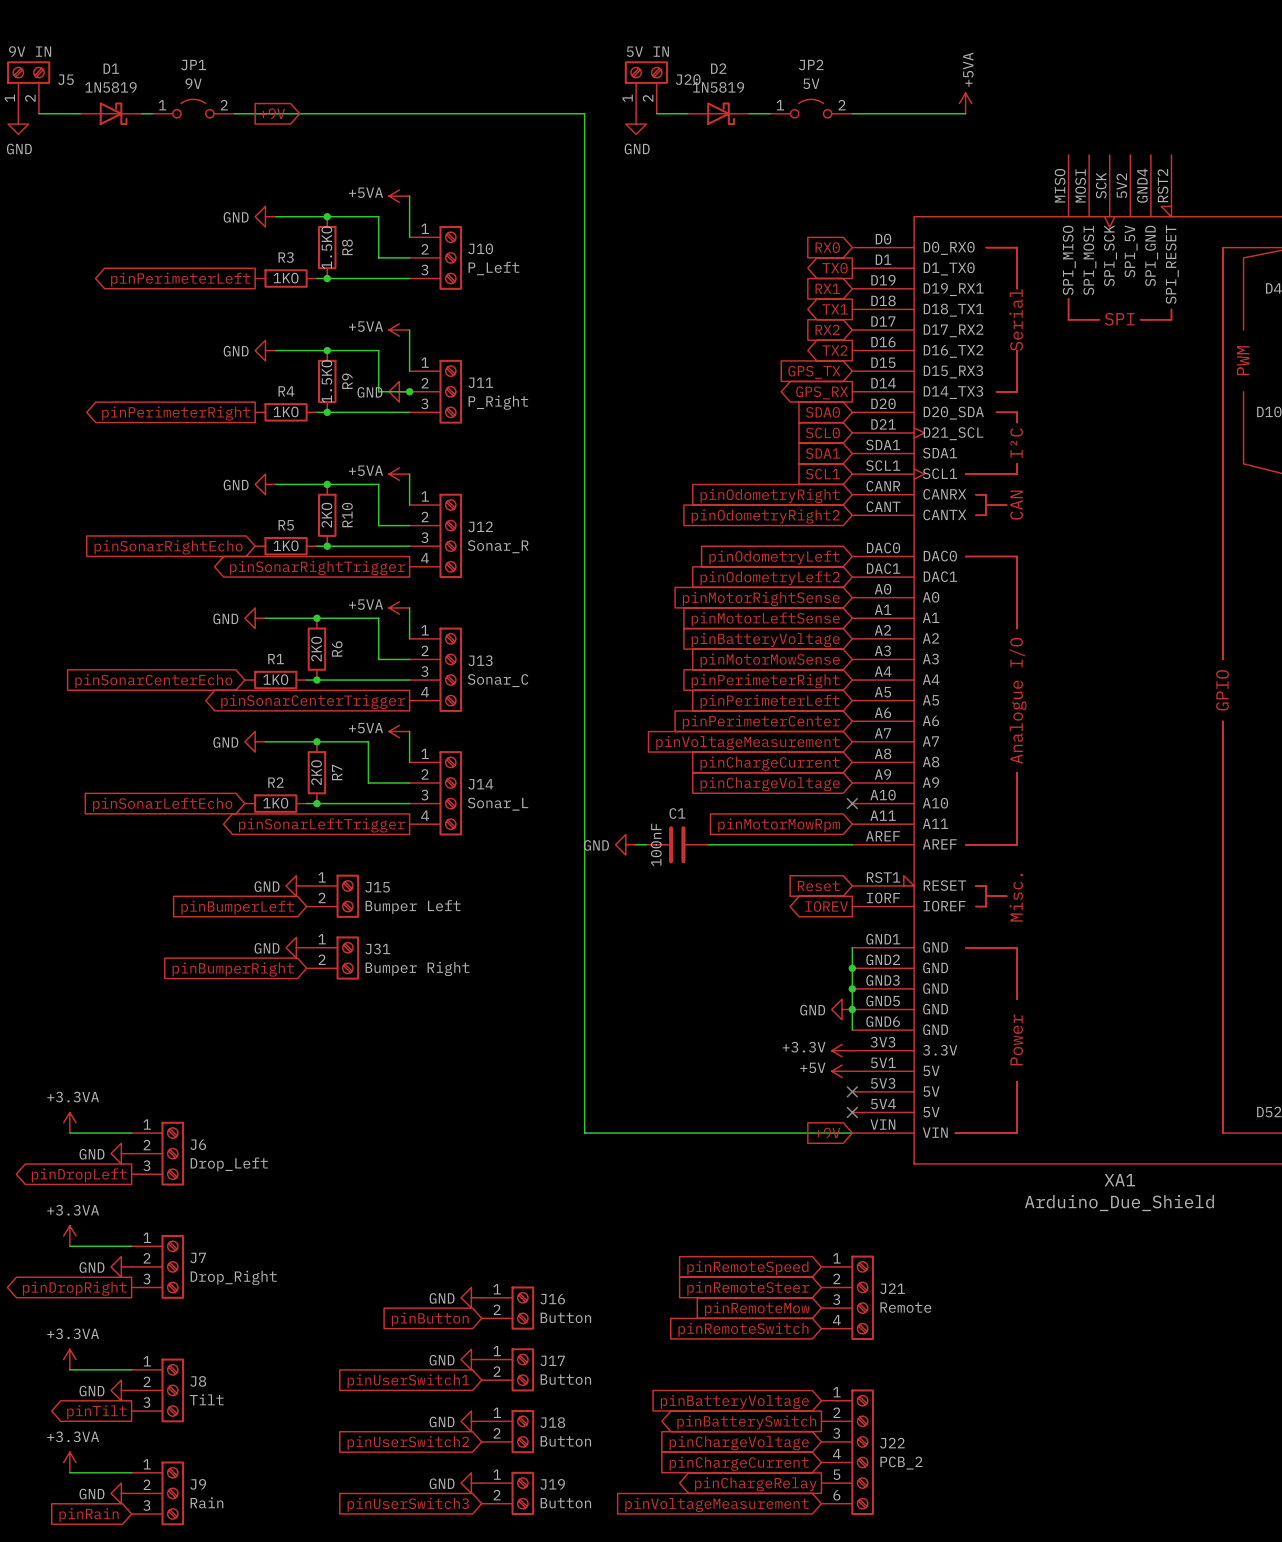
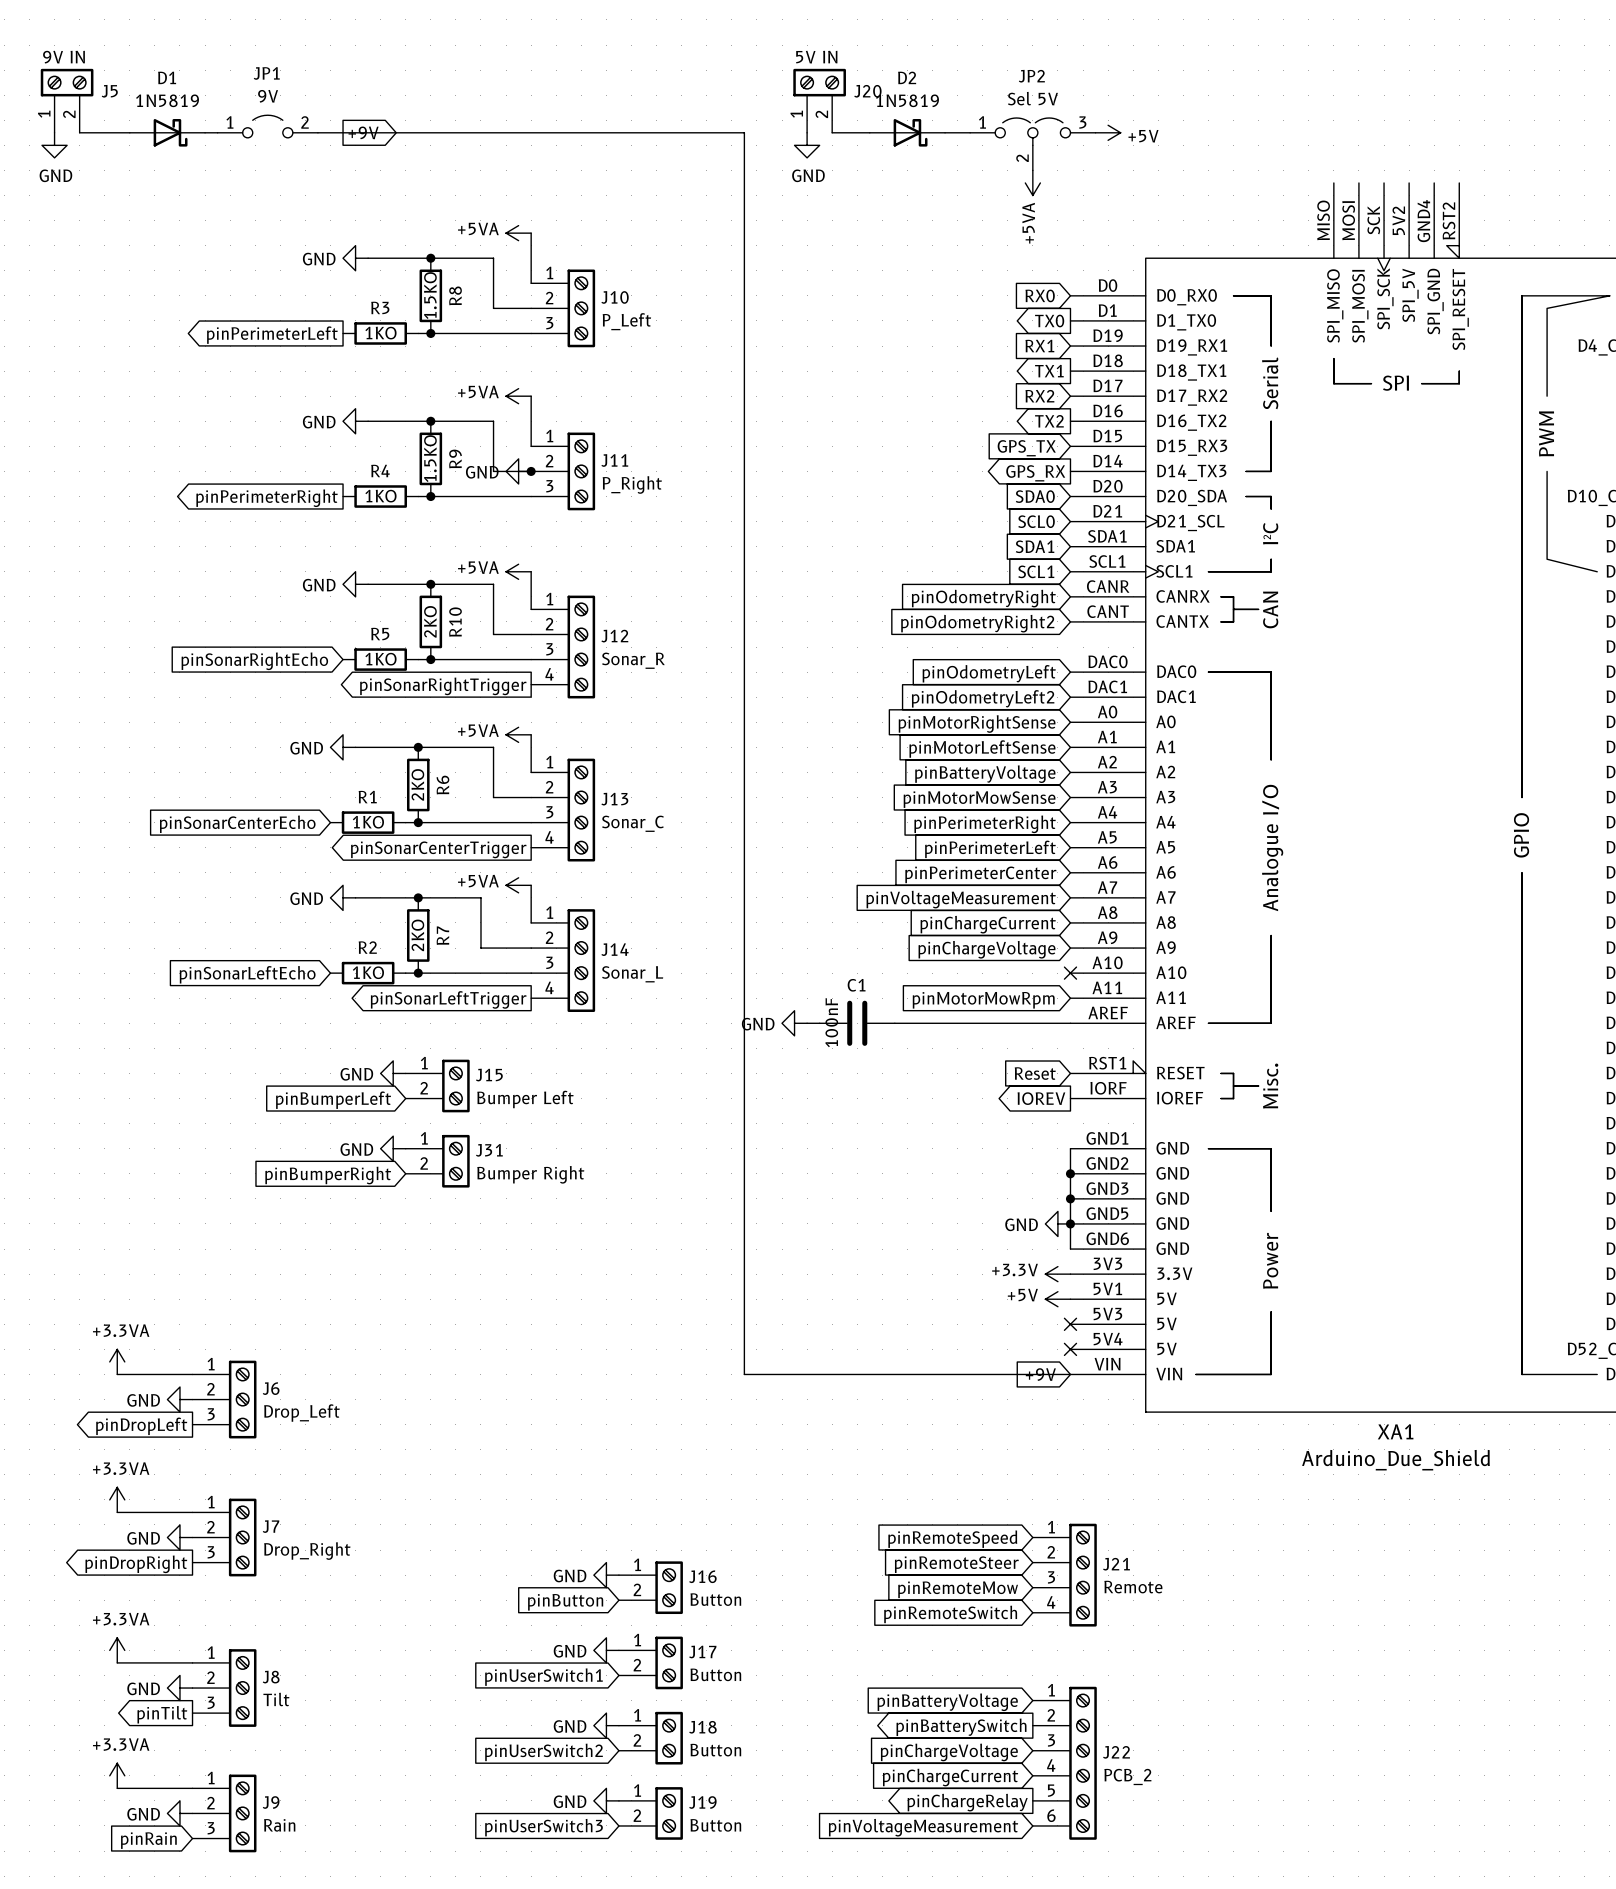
JP2 value: 5V (811, 83) -> Sel 5V (1032, 98)
JP2 symbol: [769, 99, 853, 118] -> [970, 118, 1096, 171]
power symbol rotation: 0° (965, 103) -> 180° (1032, 182)
power symbol position: +5VA (965, 103) -> +5VA (1032, 182)
wire: (852, 113) (965, 113) -> none
power symbol: none -> +5V (1108, 132)

